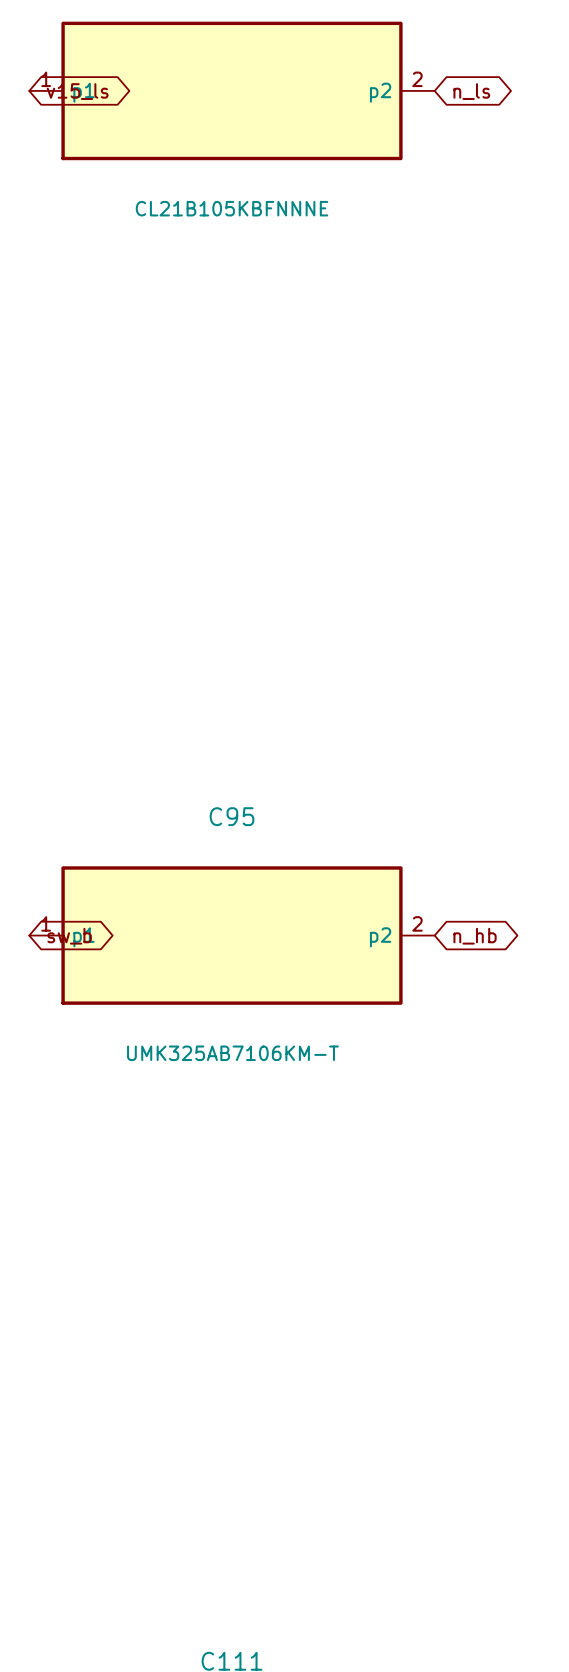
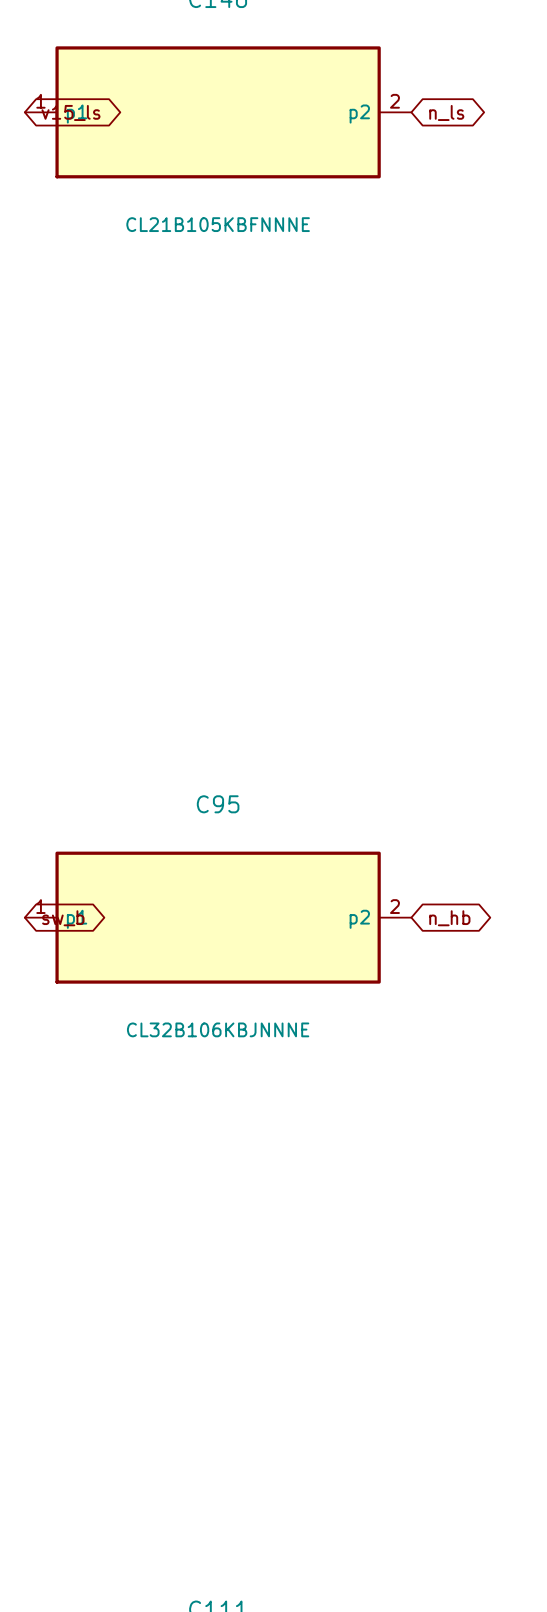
C95 value: UMK325AB7106KM-T (232, 1053) -> CL32B106KBJNNNE (218, 1029)

